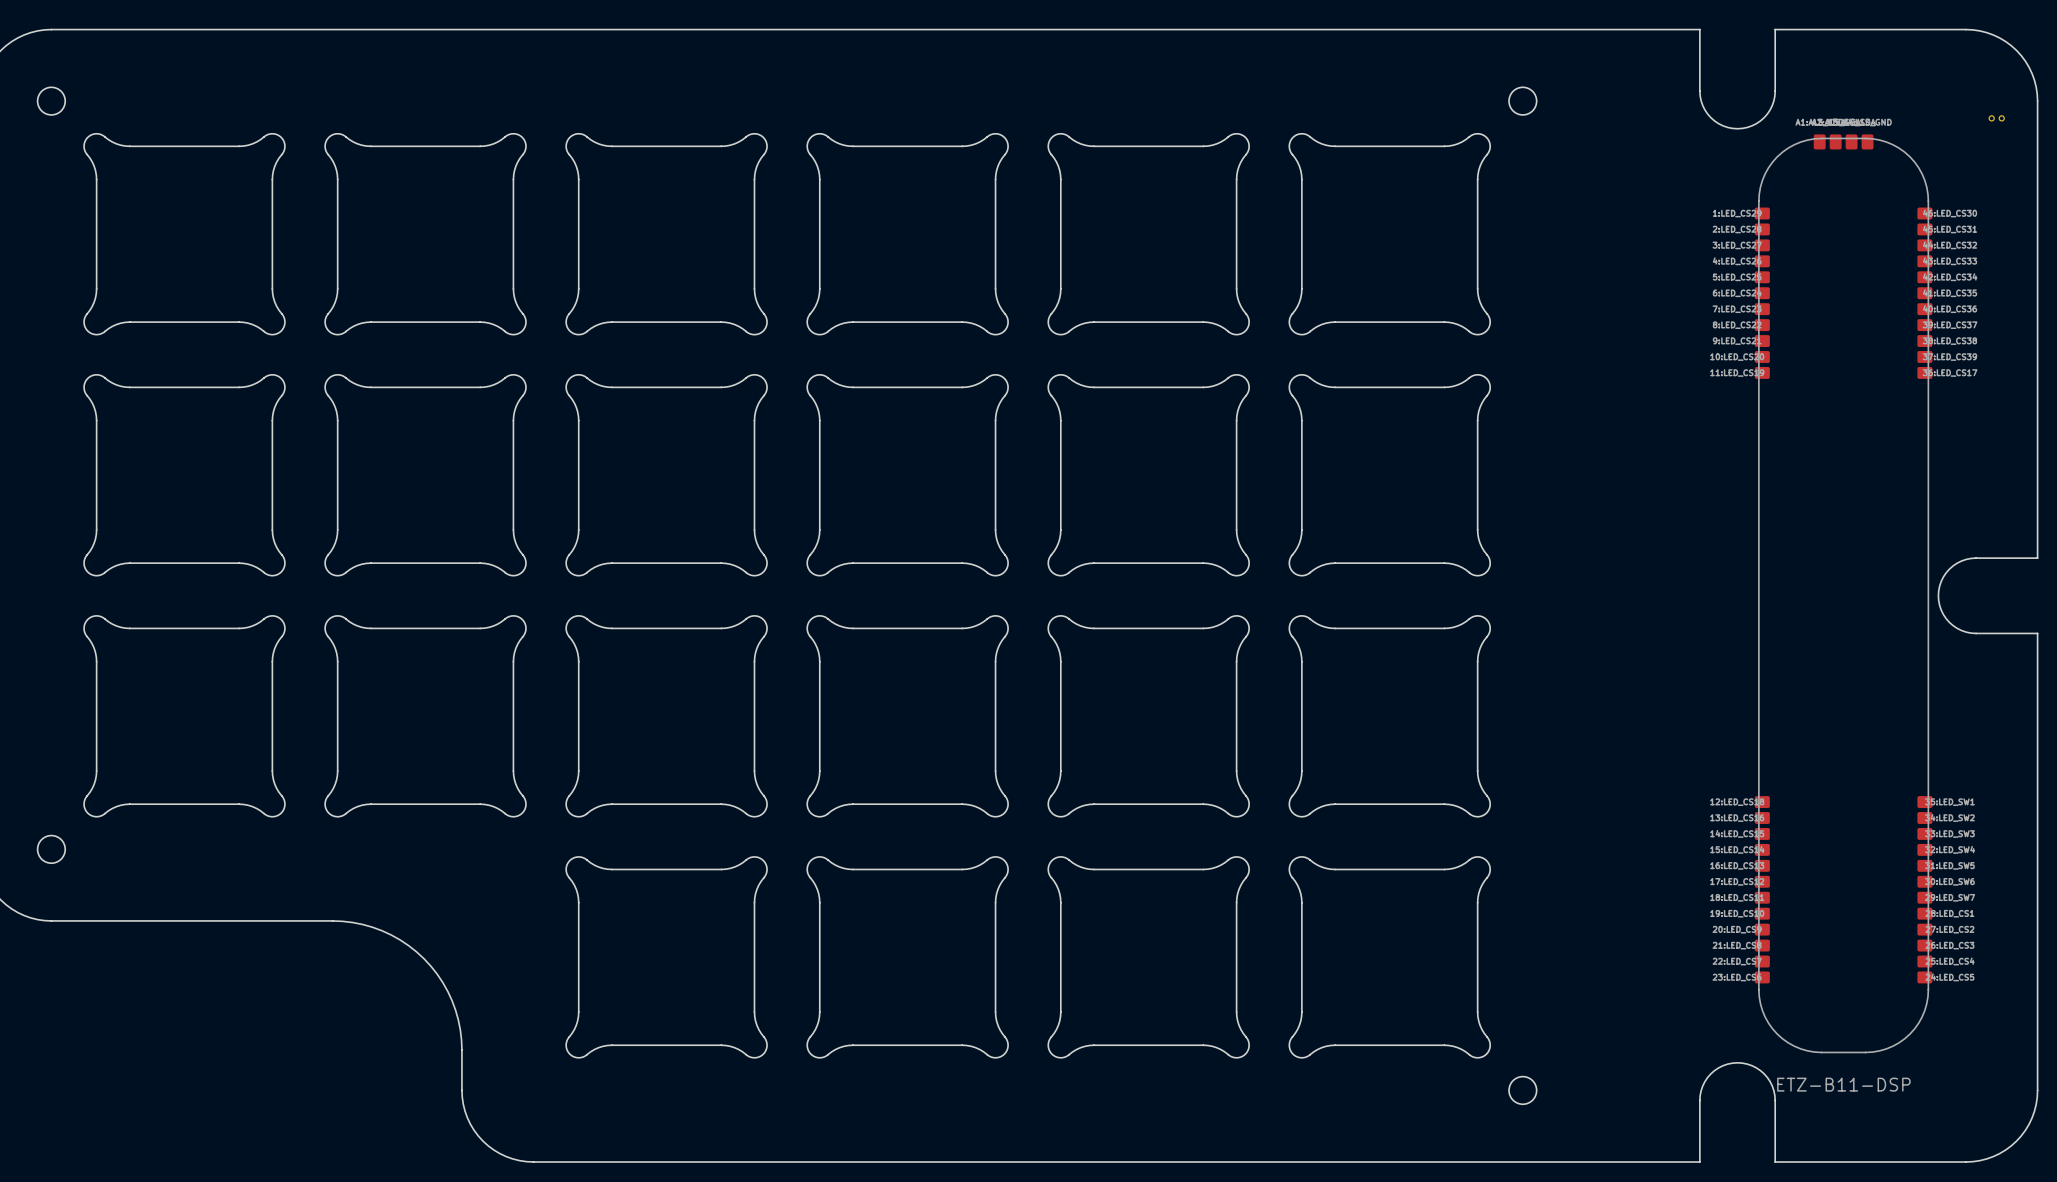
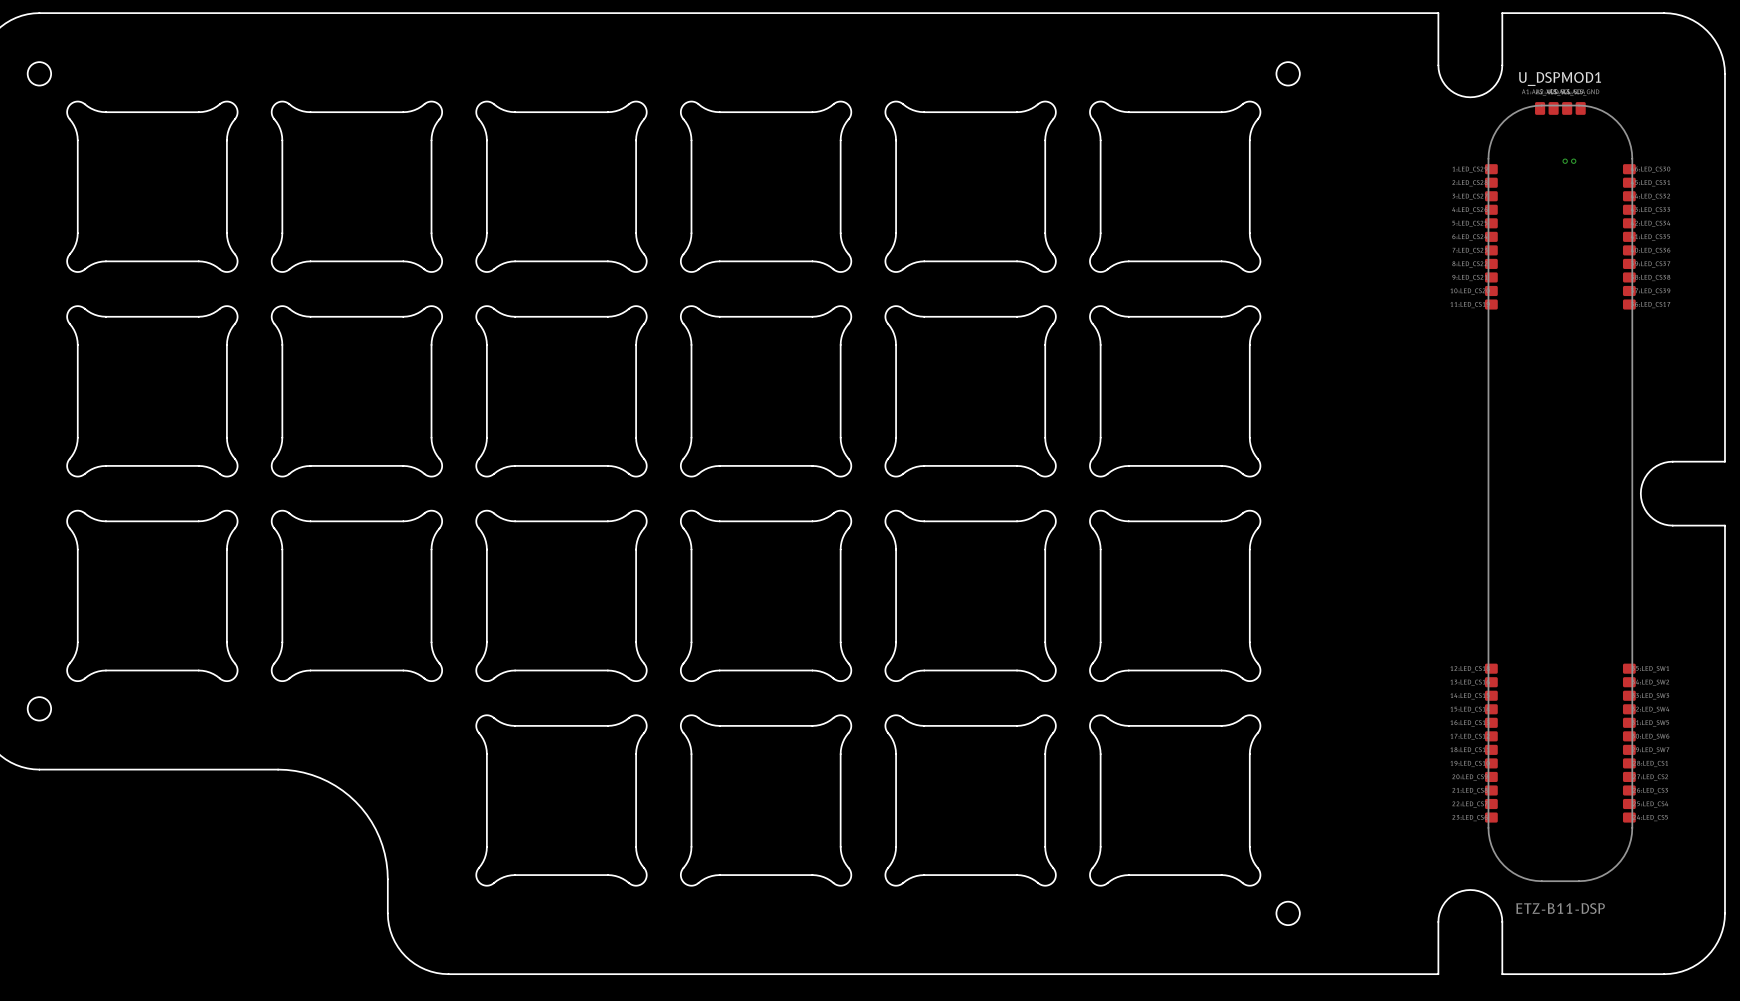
U_DSPMOD1 name: none -> U_DSPMOD1 (1560, 79)
part position: (1996, 118) -> (1569, 161)

